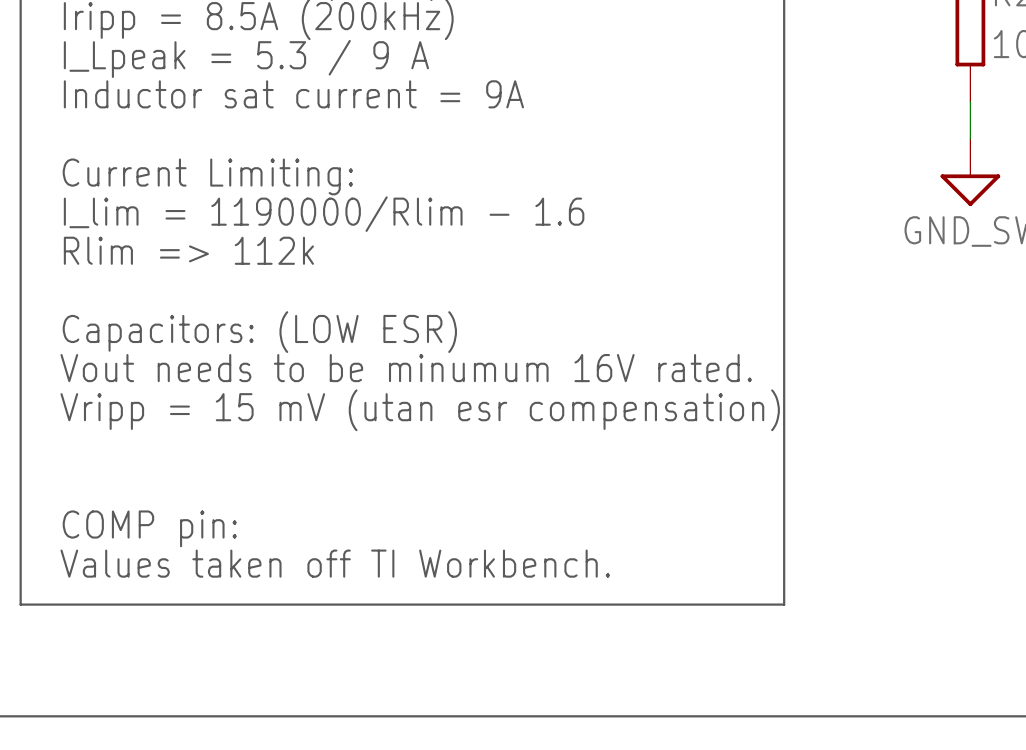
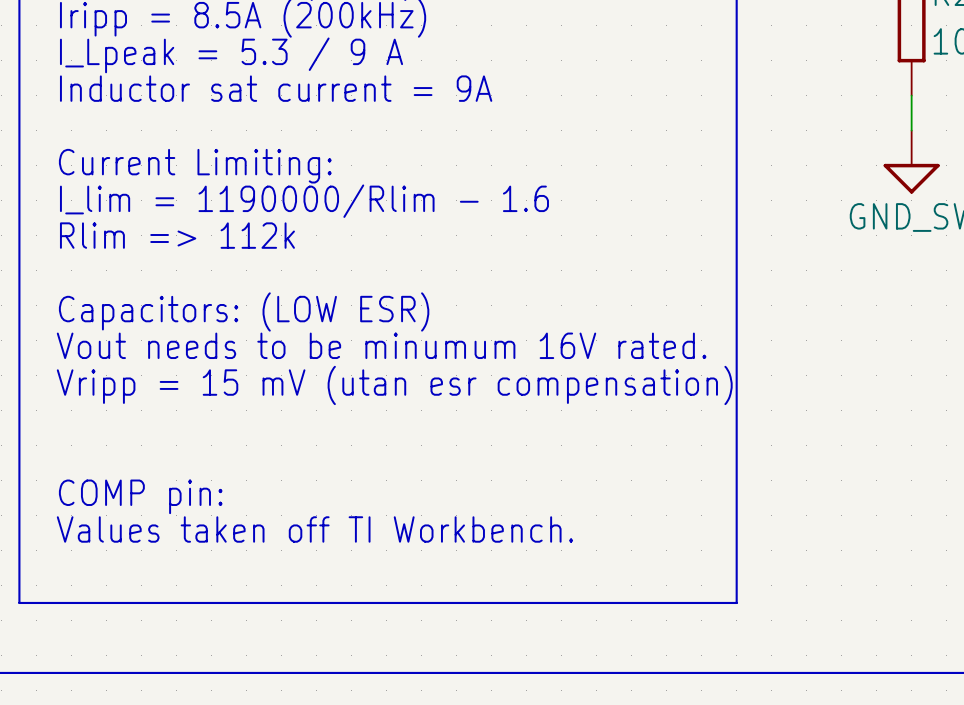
line: (20, 604) (784, 604) -> (19, 567) (19, 602) (736, 602) (736, 567)

